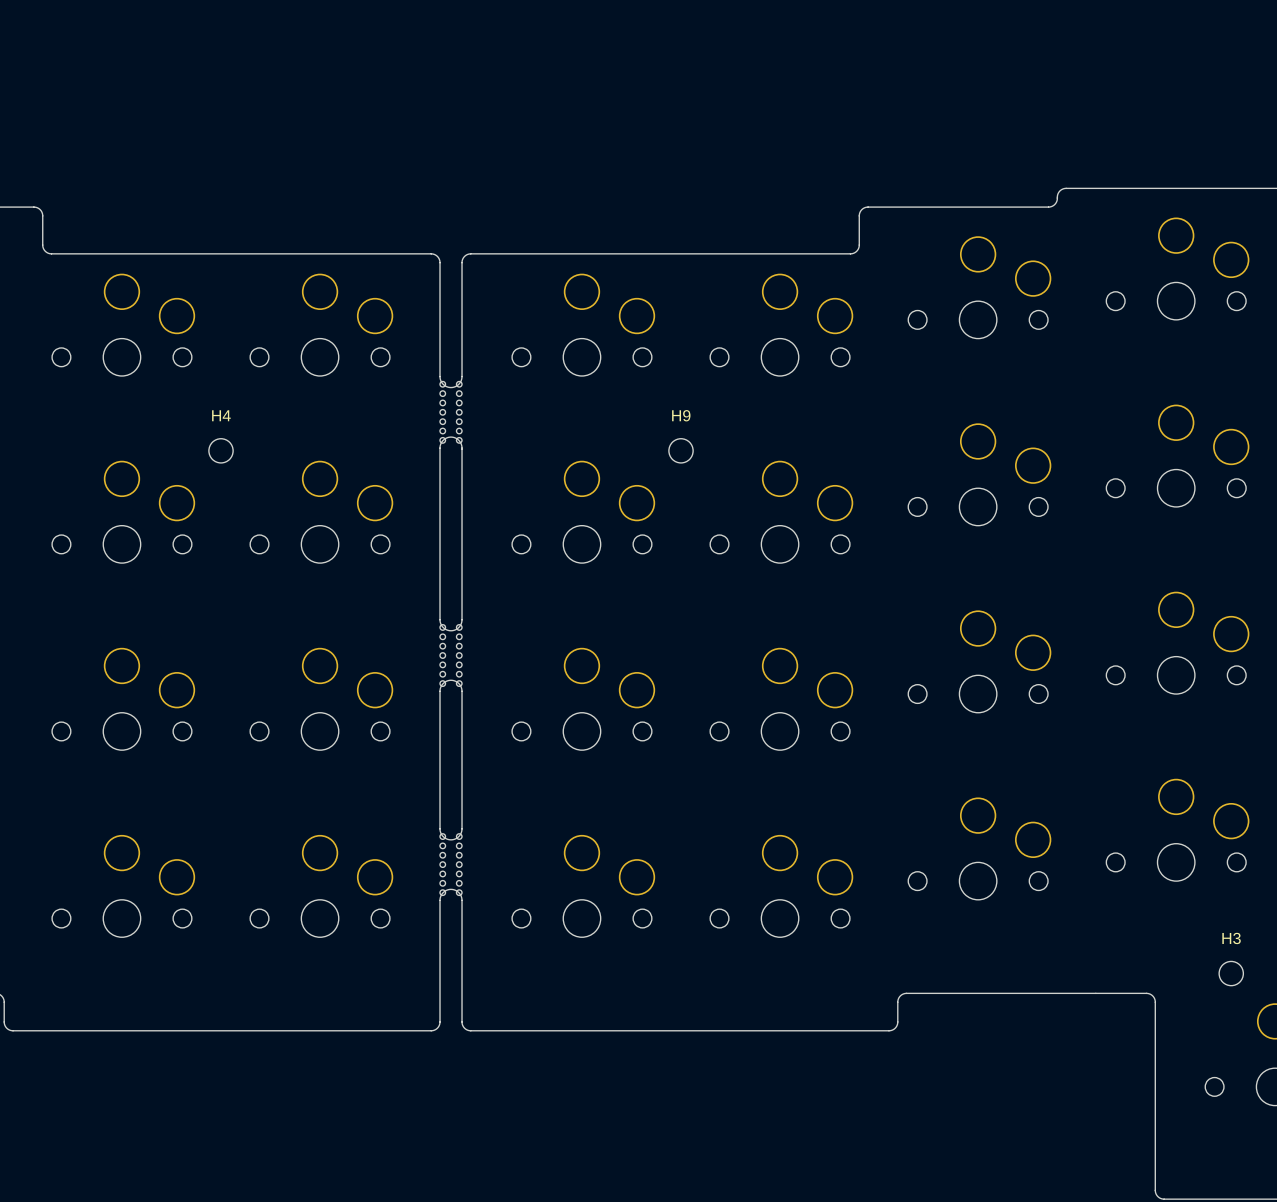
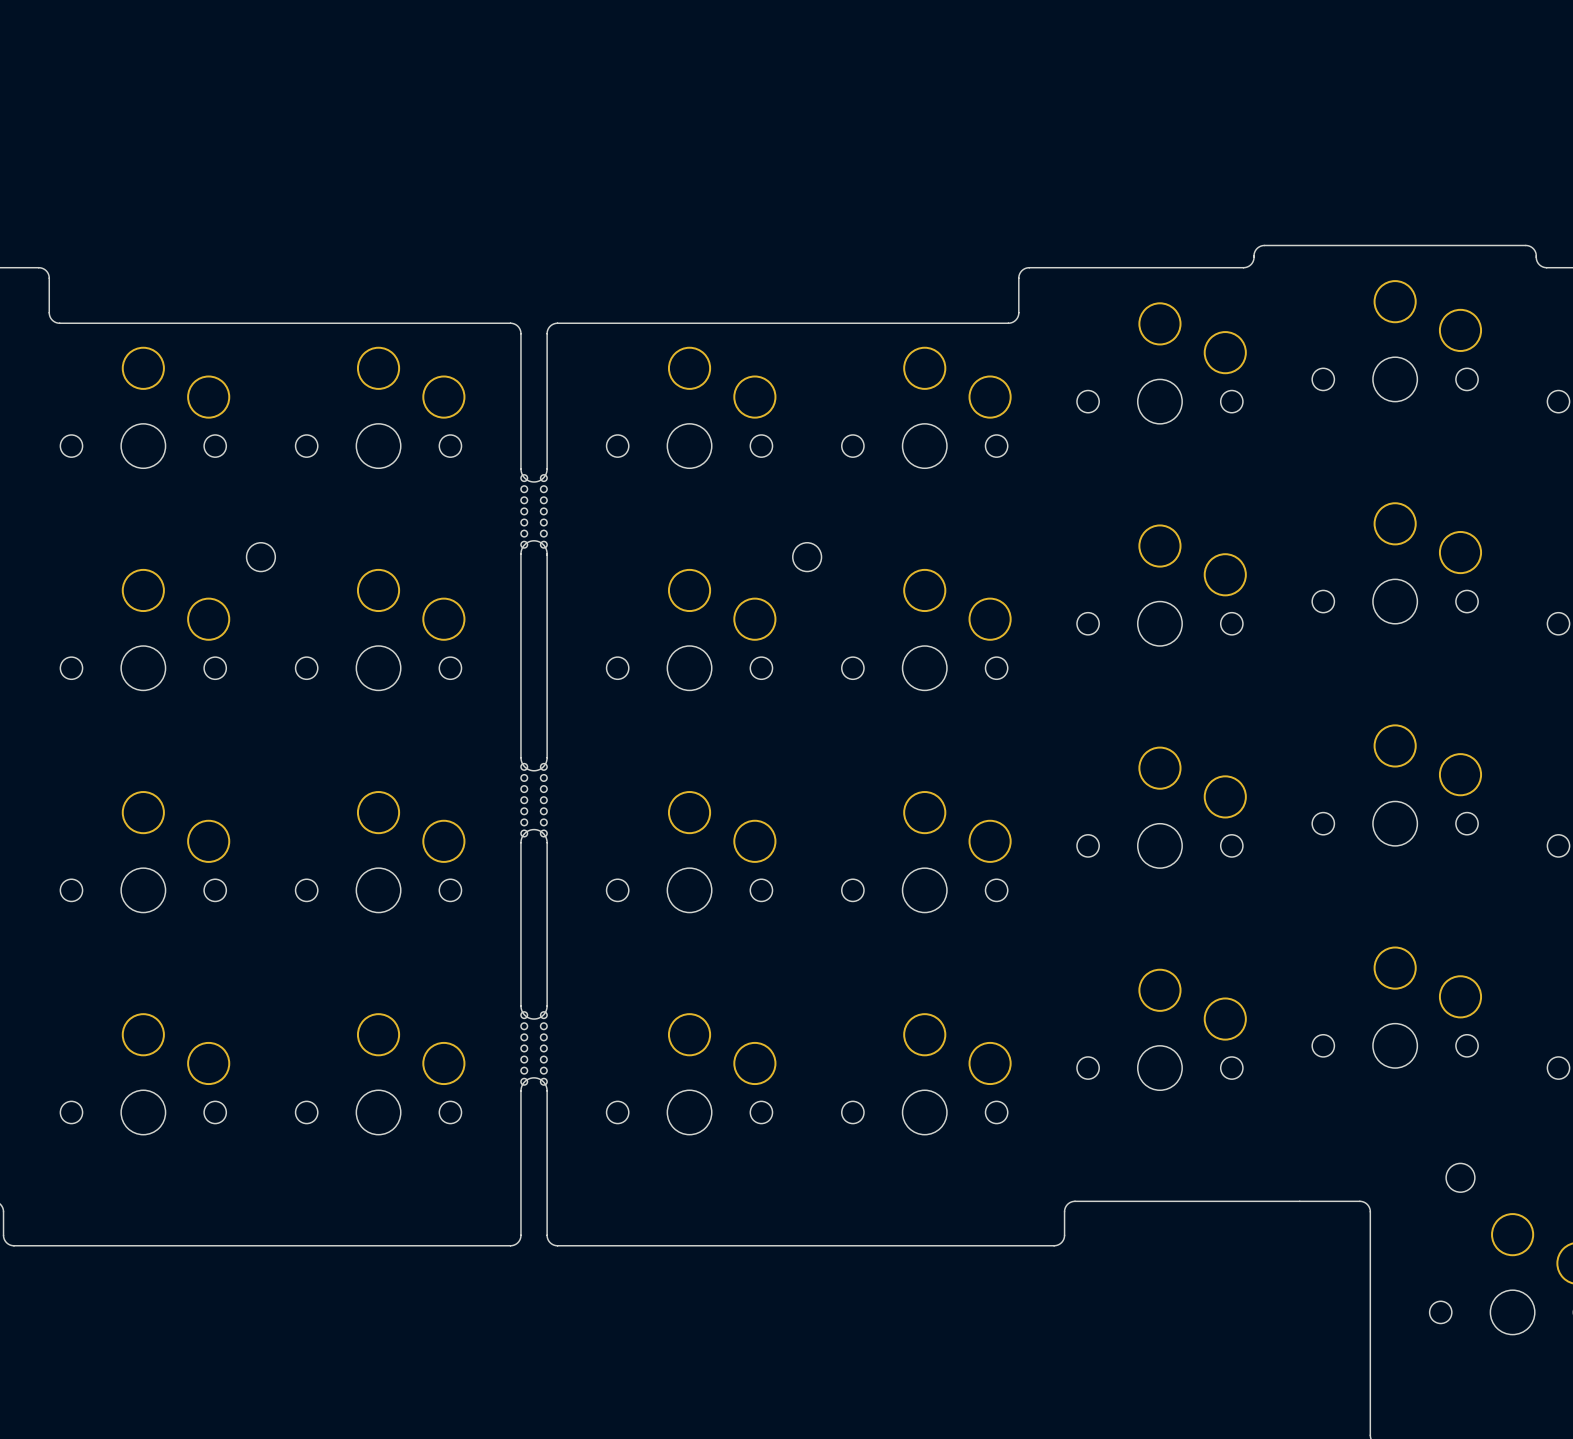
H4 name: H4 (221, 415) -> none
H9 name: H9 (681, 415) -> none
H3 name: H3 (1231, 938) -> none

